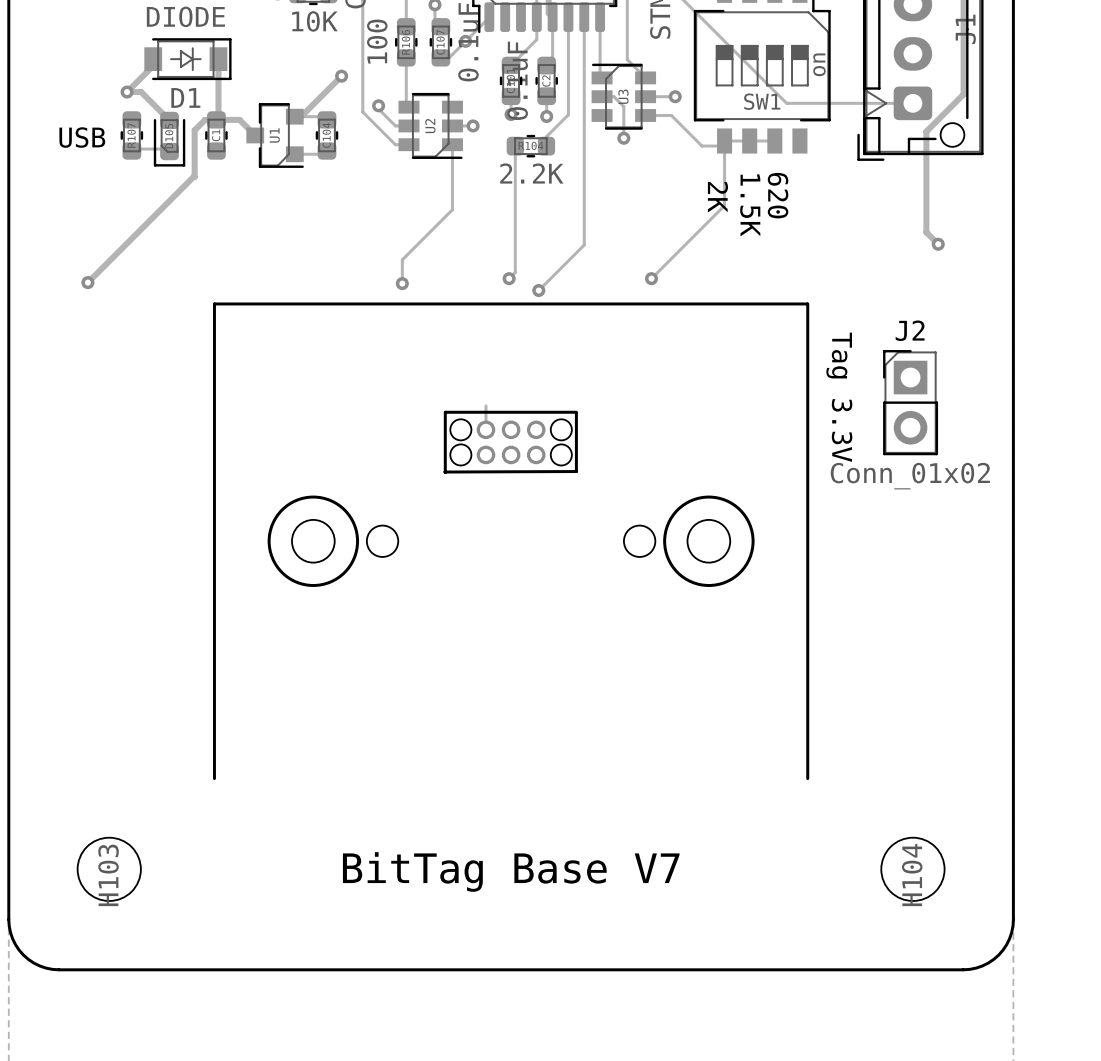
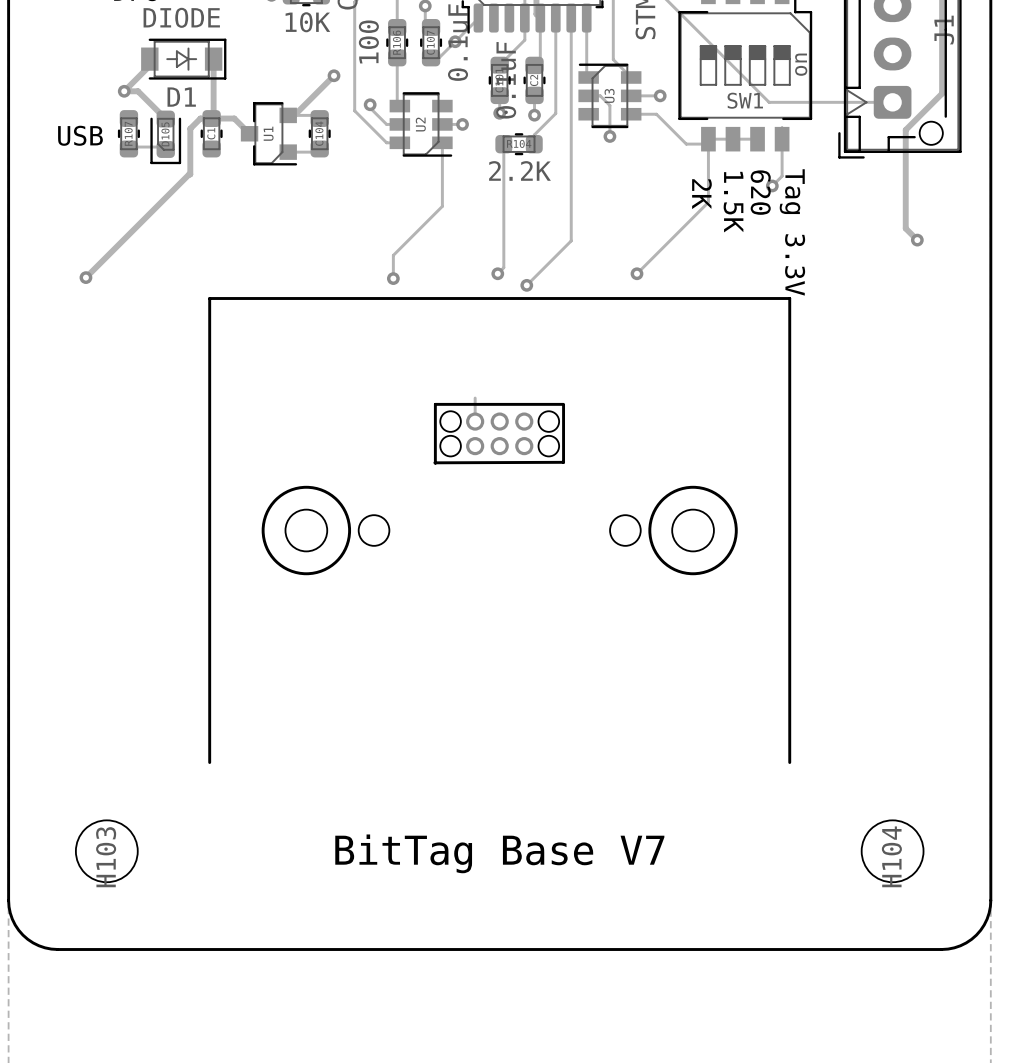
track: none -> (782, 127) (782, 176) (772, 185)
via: none -> (772, 185)
text position: Tag 3.3V (839, 397) -> Tag 3.3V (792, 232)
J2: Conn_01x02 (910, 402) -> none

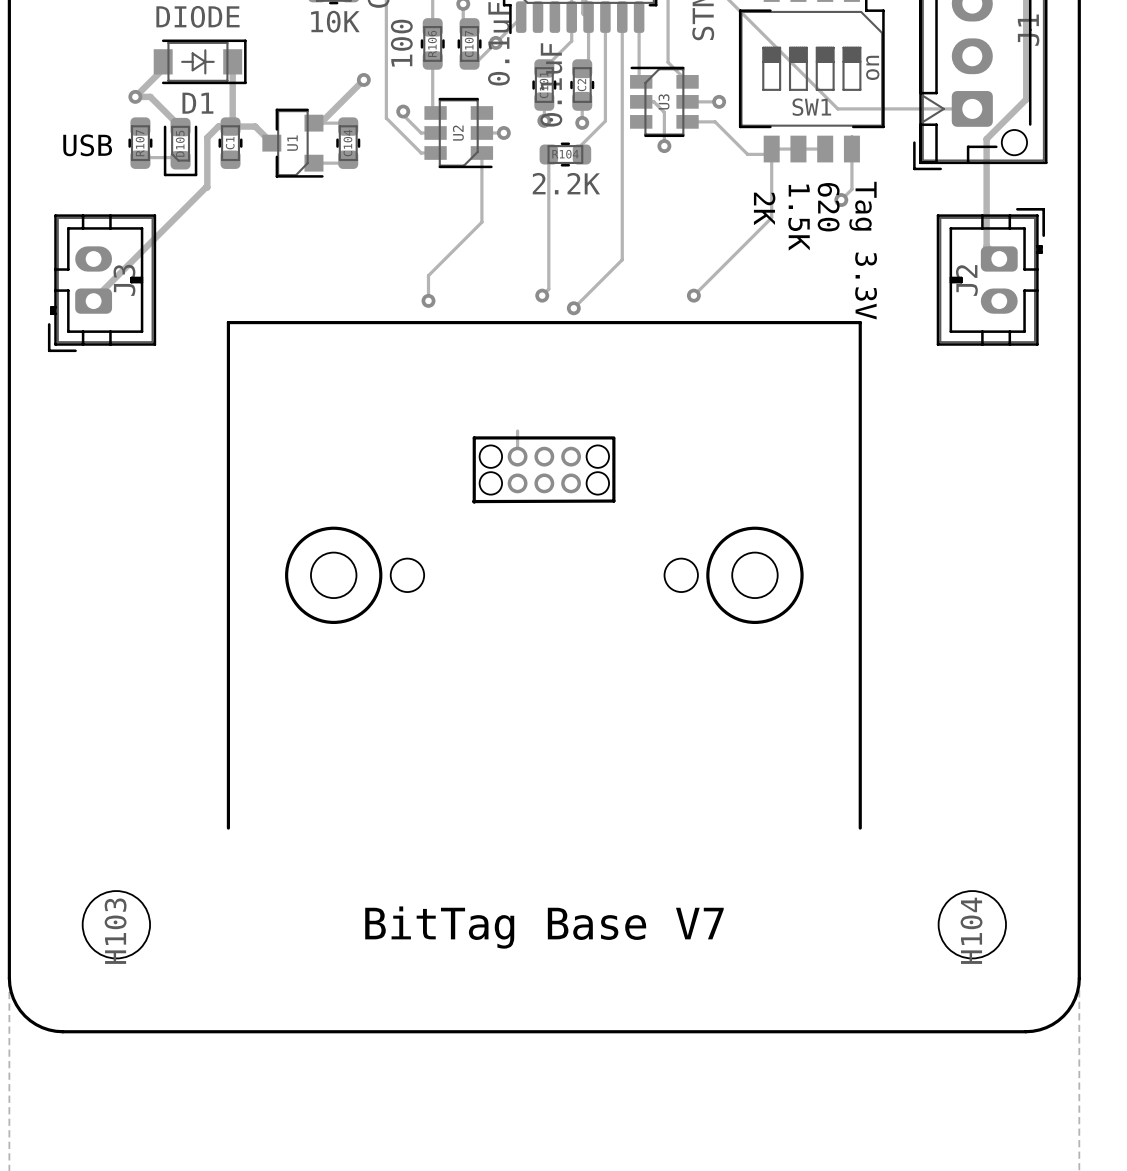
via: (917, 240) -> none
J2: none -> (990, 276)
J3: none -> (102, 283)
via: (85, 277) -> none

